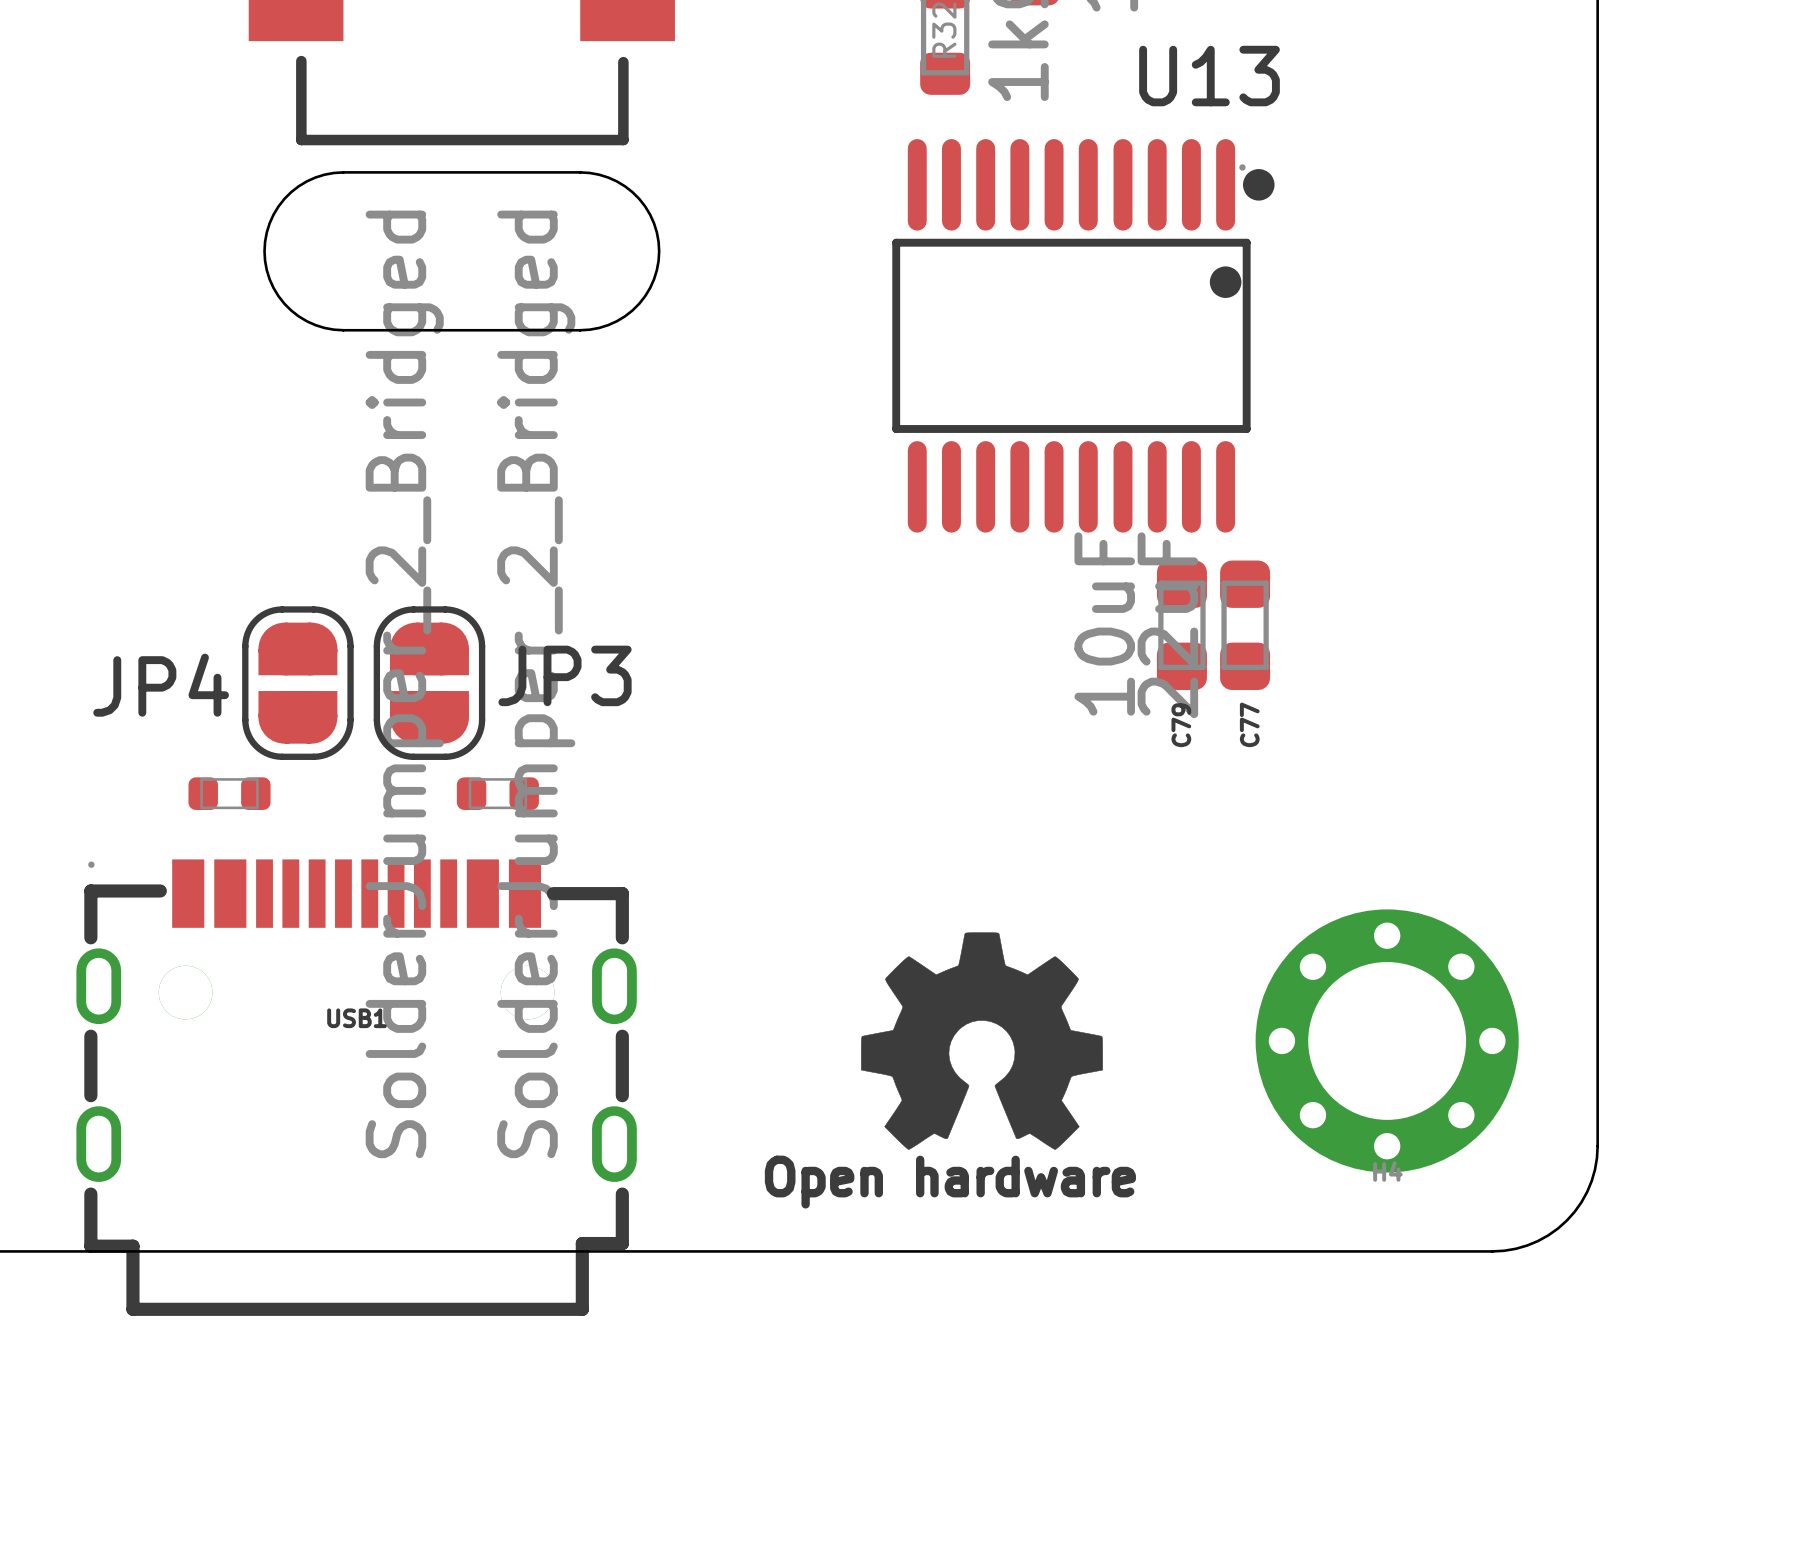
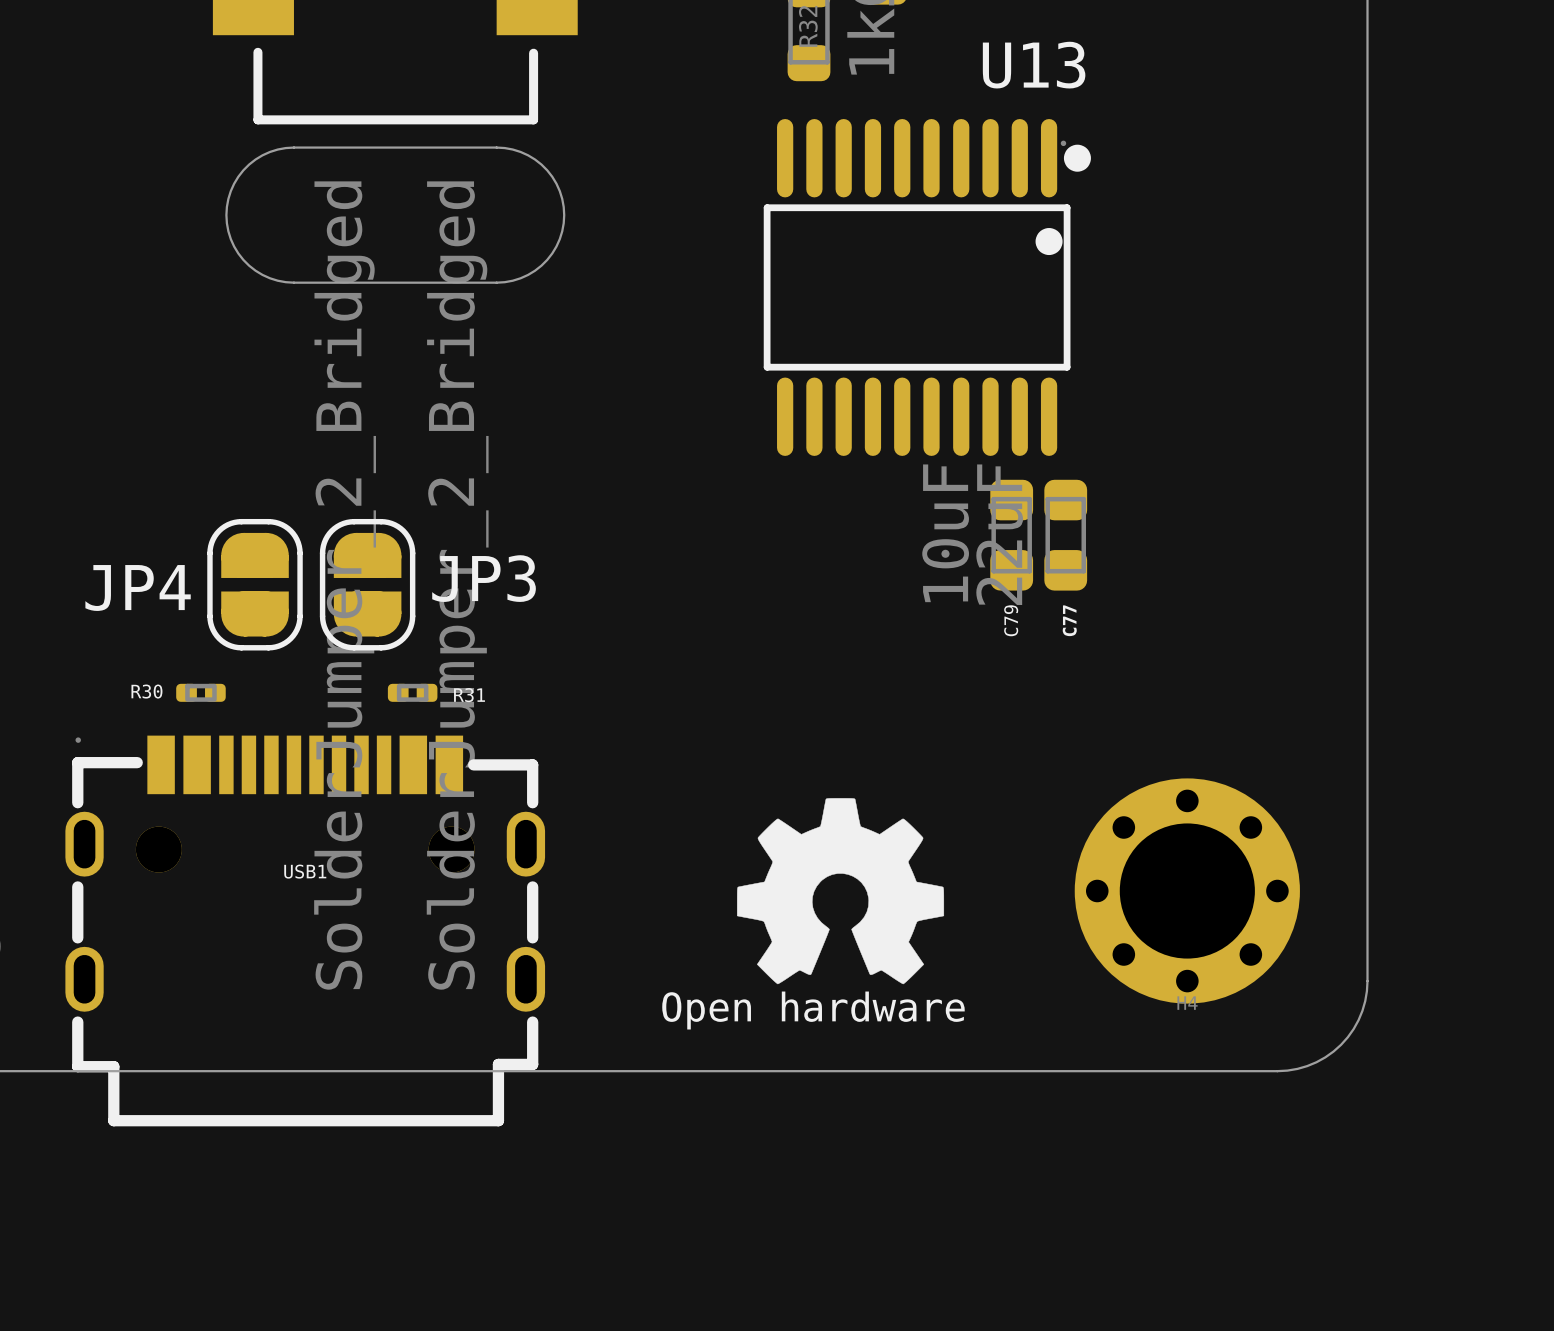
part: (229, 793) -> none
part: (497, 793) -> none
R30: none -> (200, 692)
R31: none -> (412, 692)

